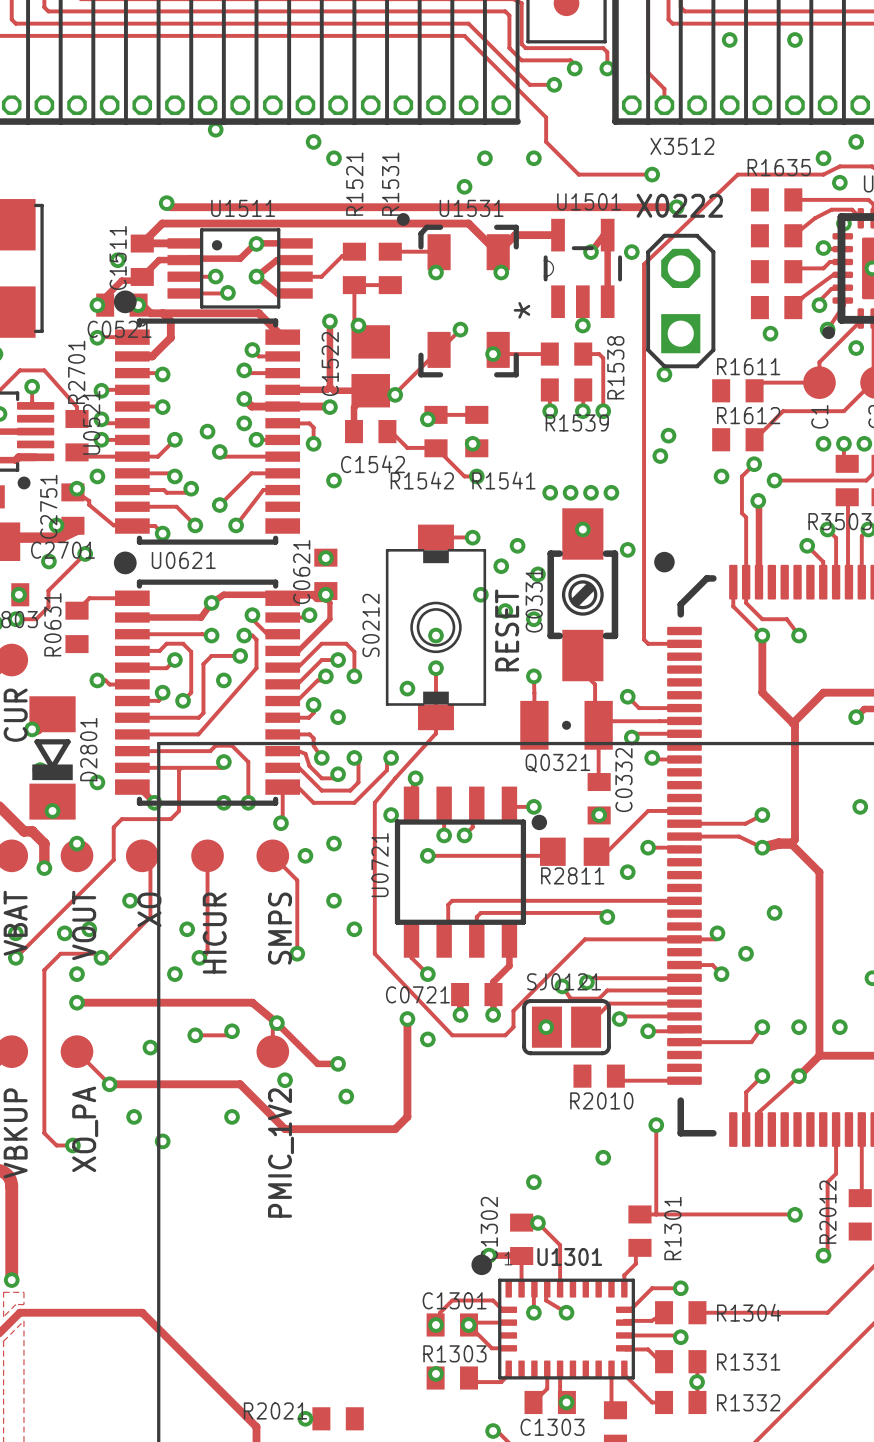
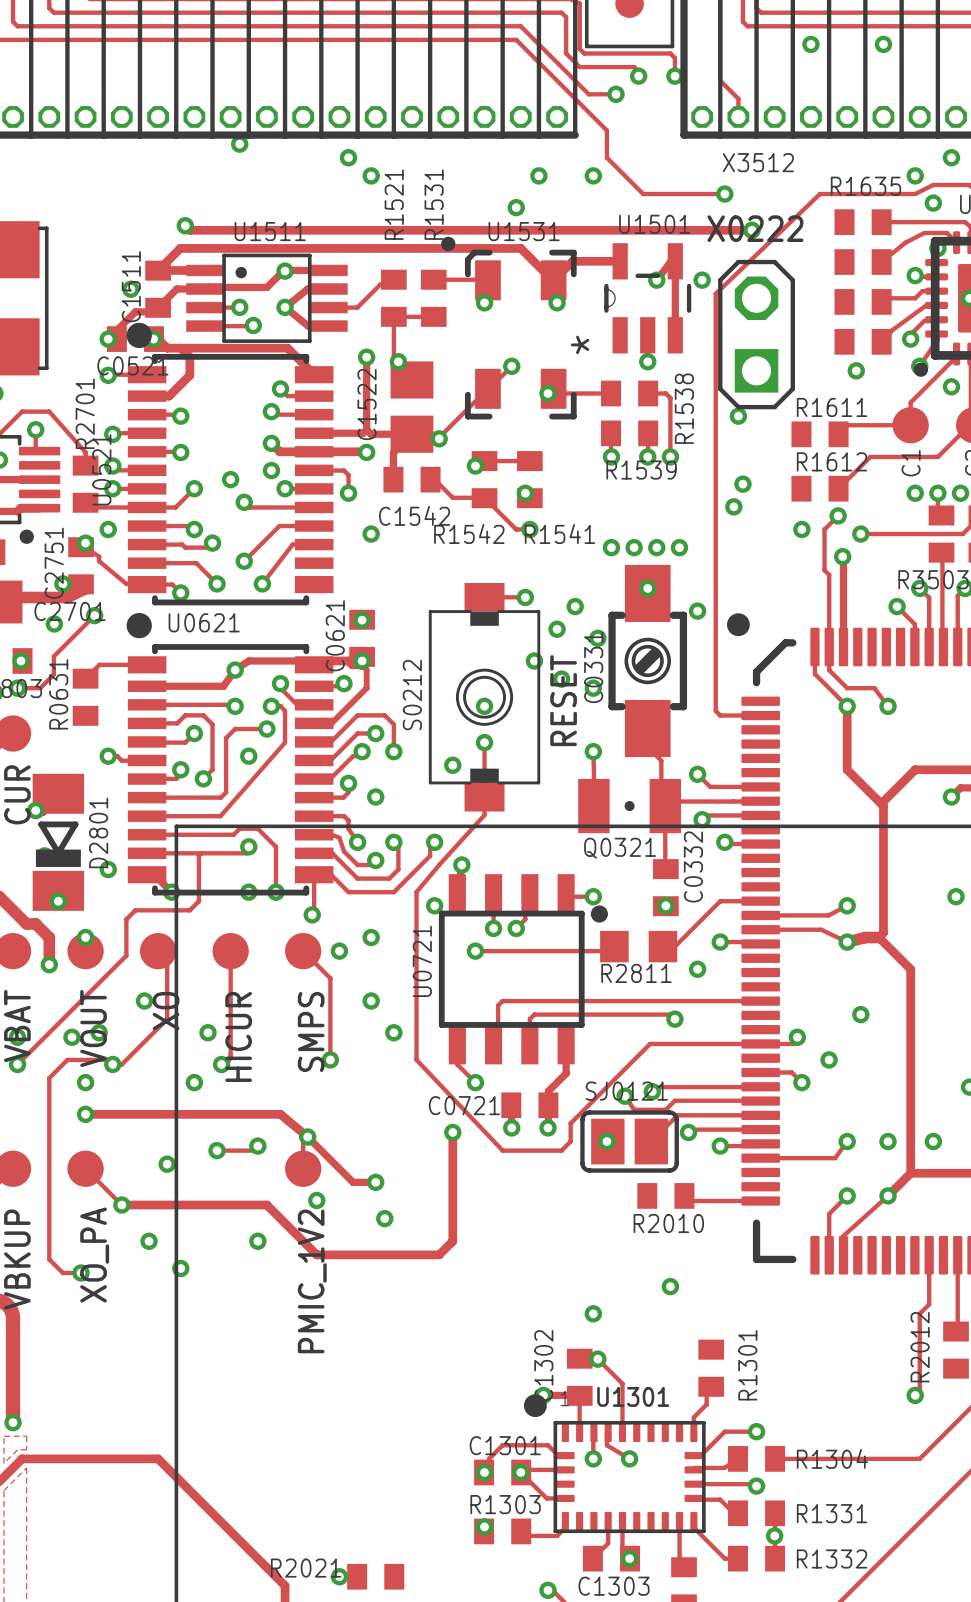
via: (427, 1039) -> none
track: (656, 1125) (656, 1214) -> none
via: (656, 1125) -> none
track: (639, 1214) (794, 1214) -> none
via: (794, 1214) -> none

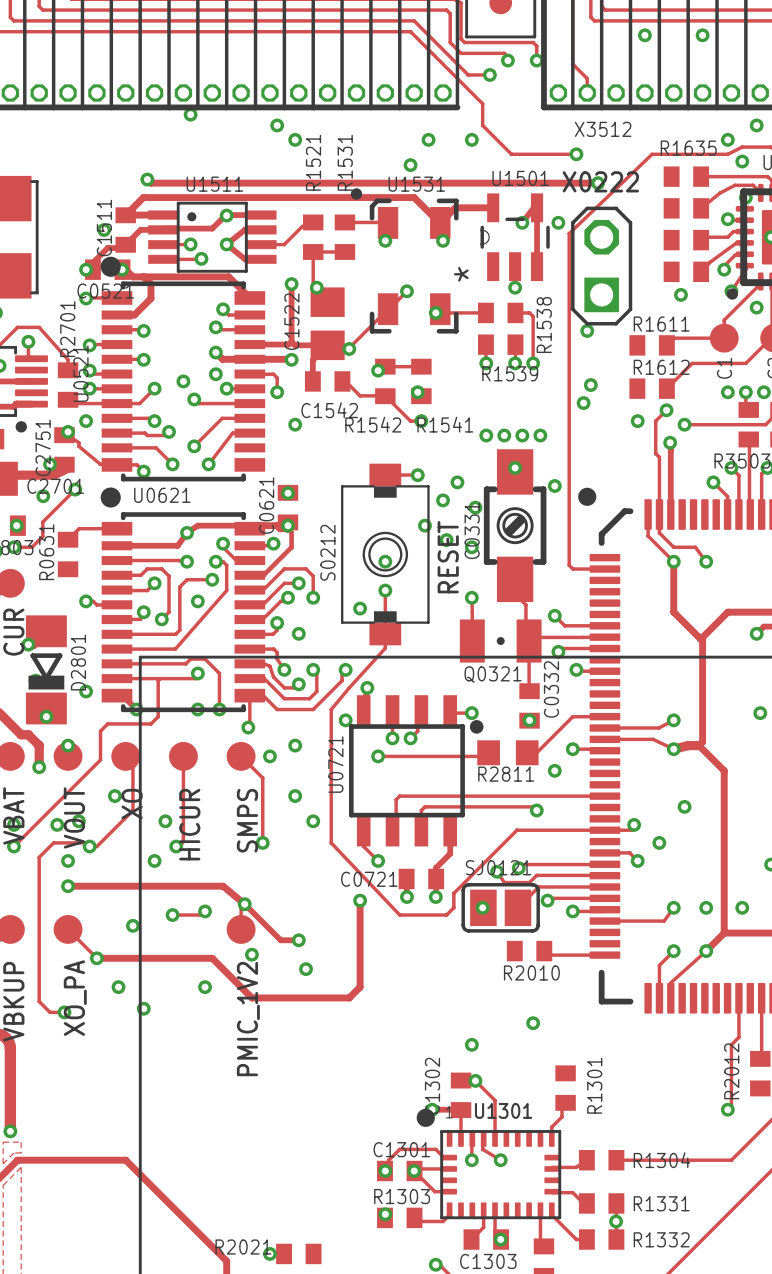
track: (756, 1431) (724, 1431) (700, 1455) (694, 1455) -> none
via: (756, 1431) -> none
track: (694, 1484) (754, 1484) (756, 1486) -> none
via: (756, 1486) -> none

